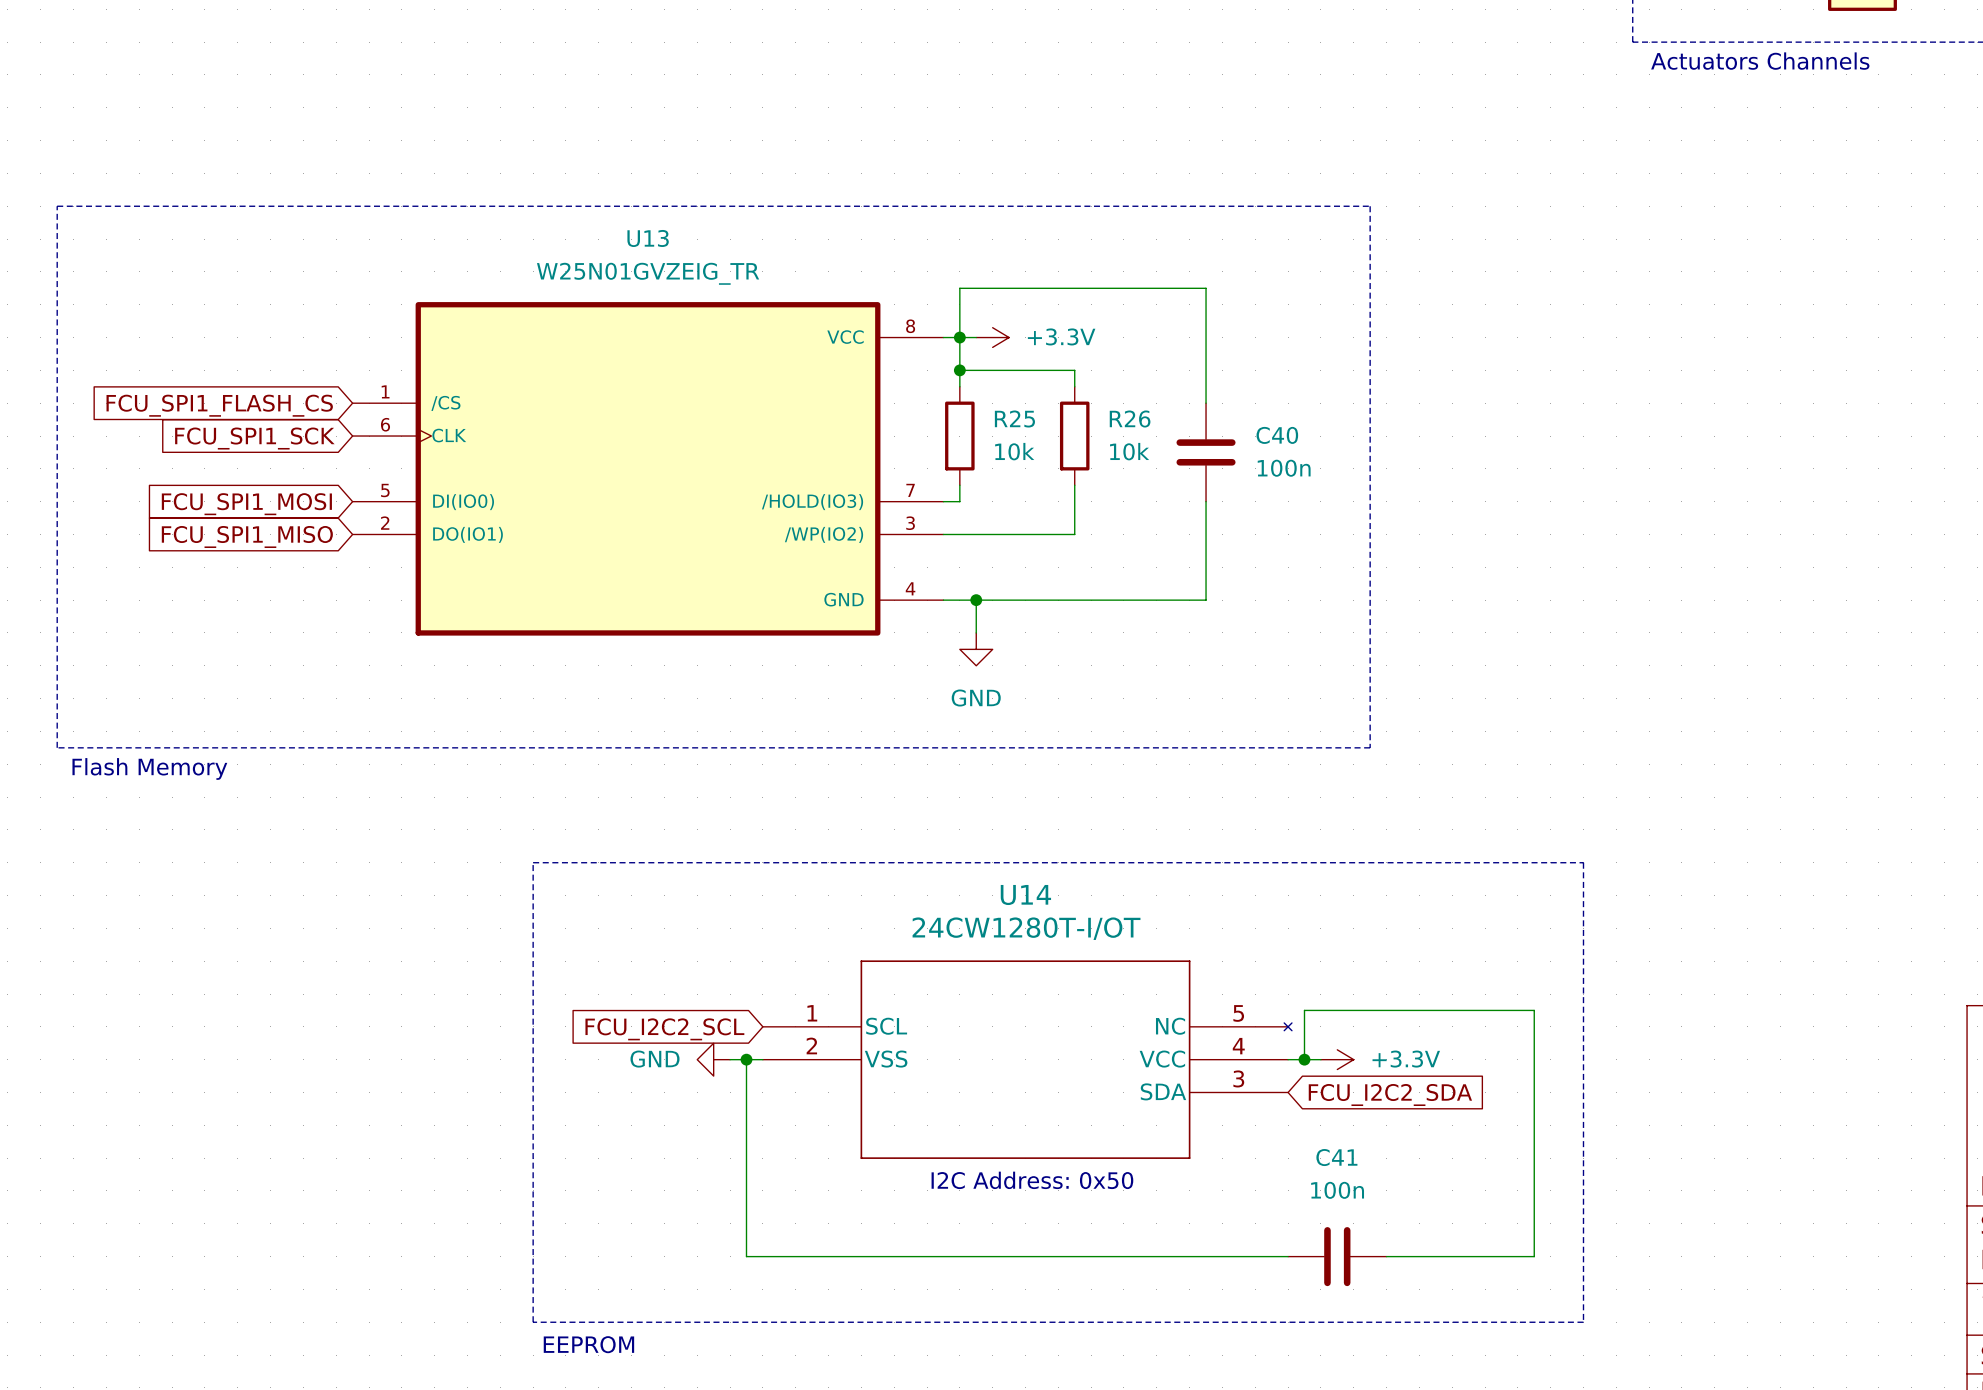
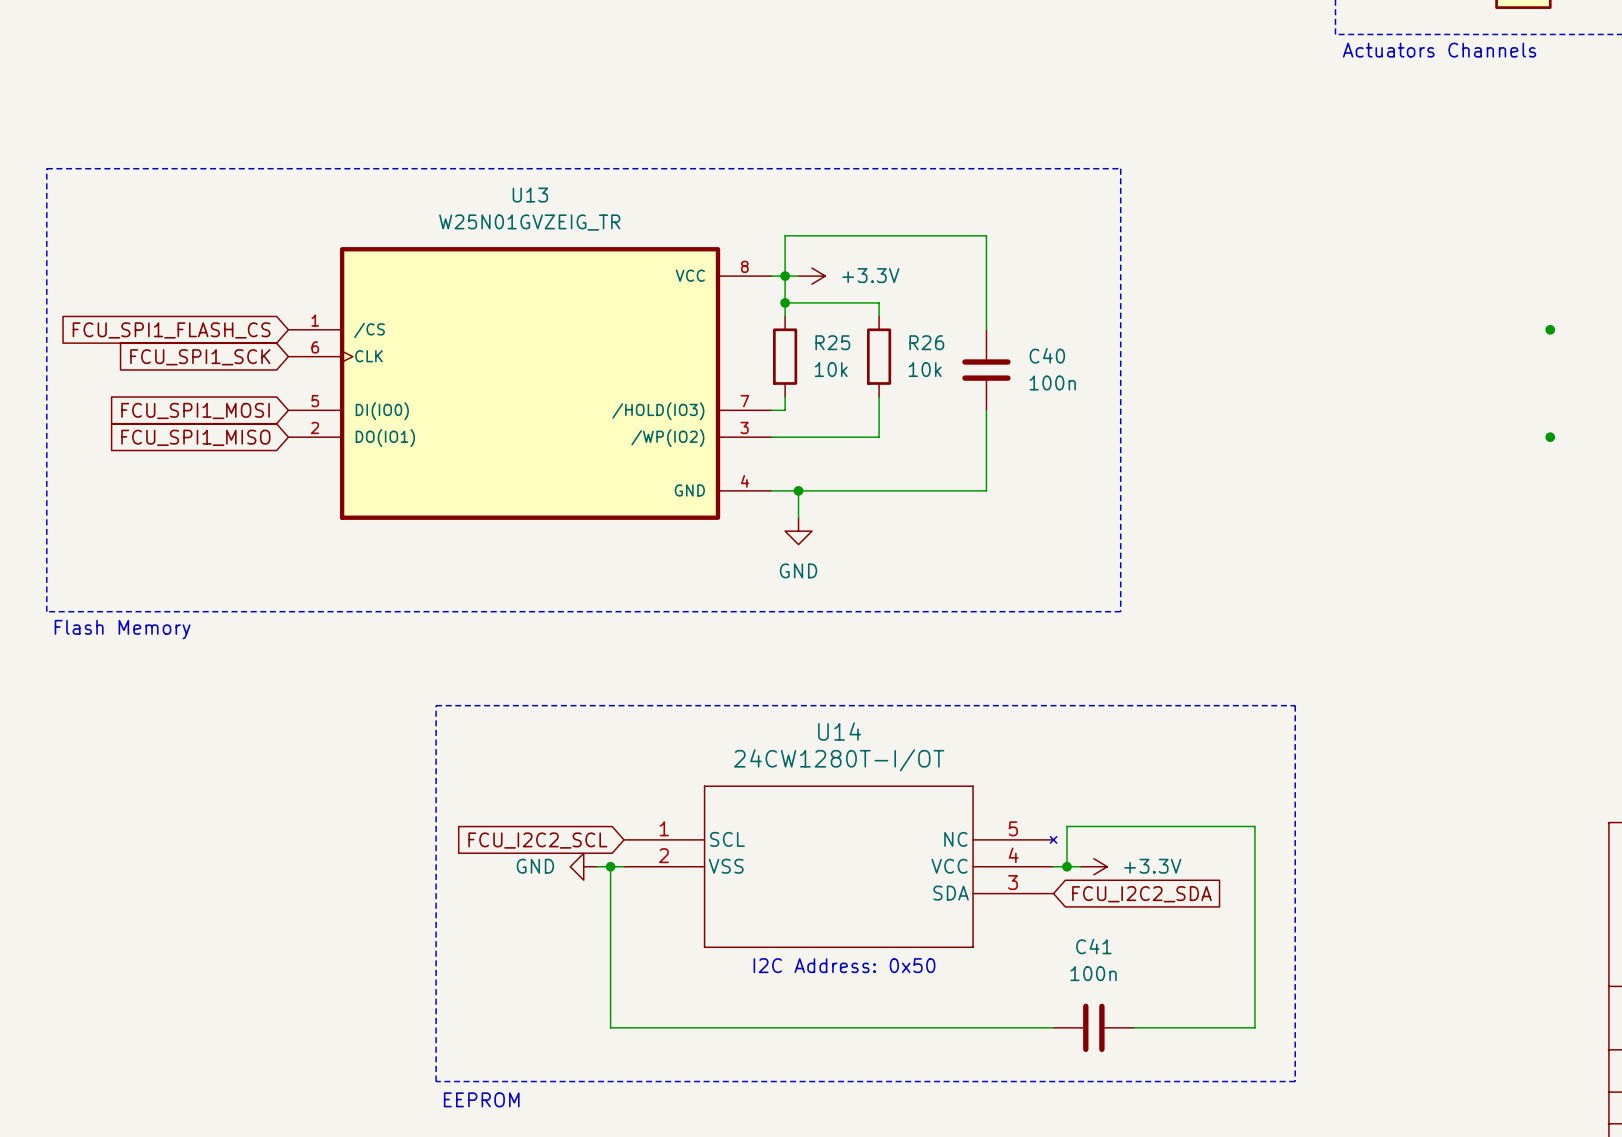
junction: none -> (1550, 329)
junction: none -> (1550, 437)

